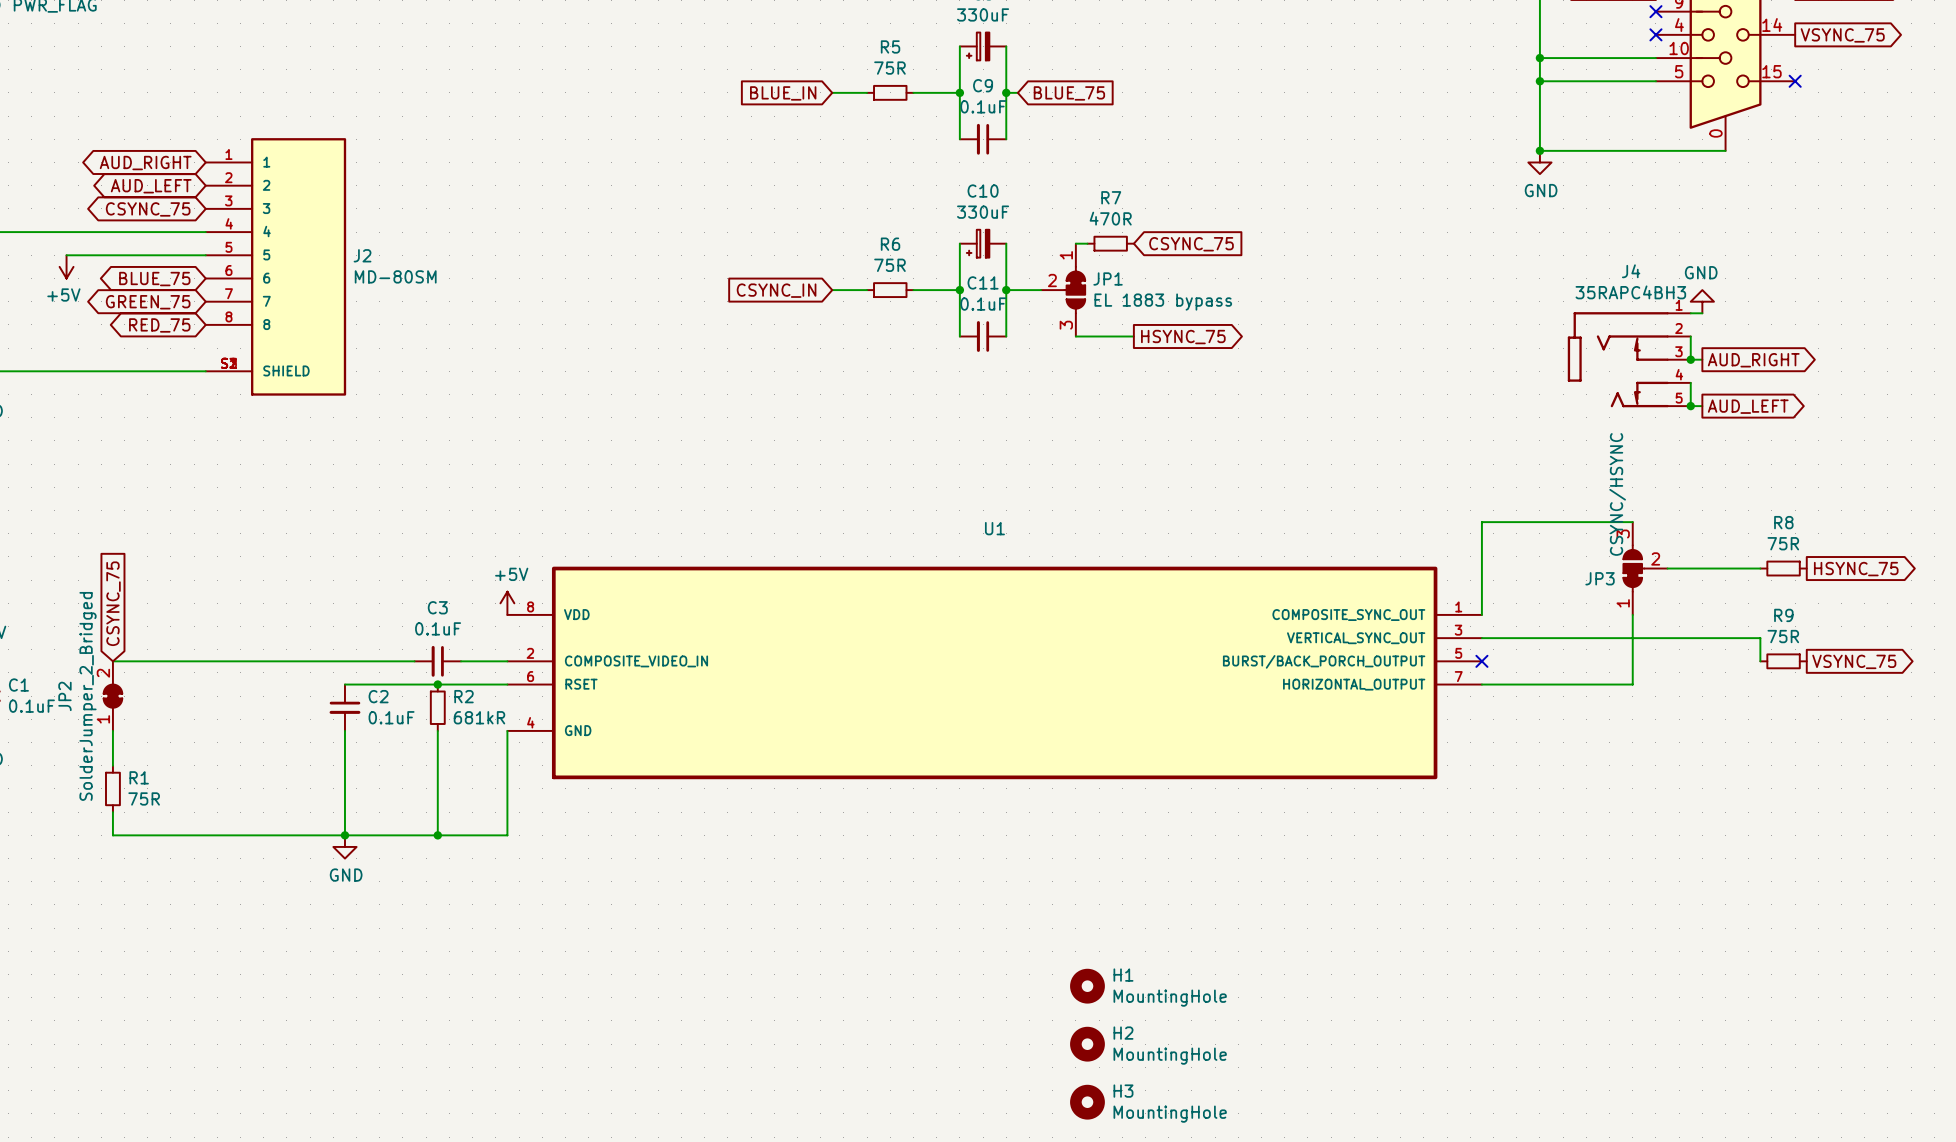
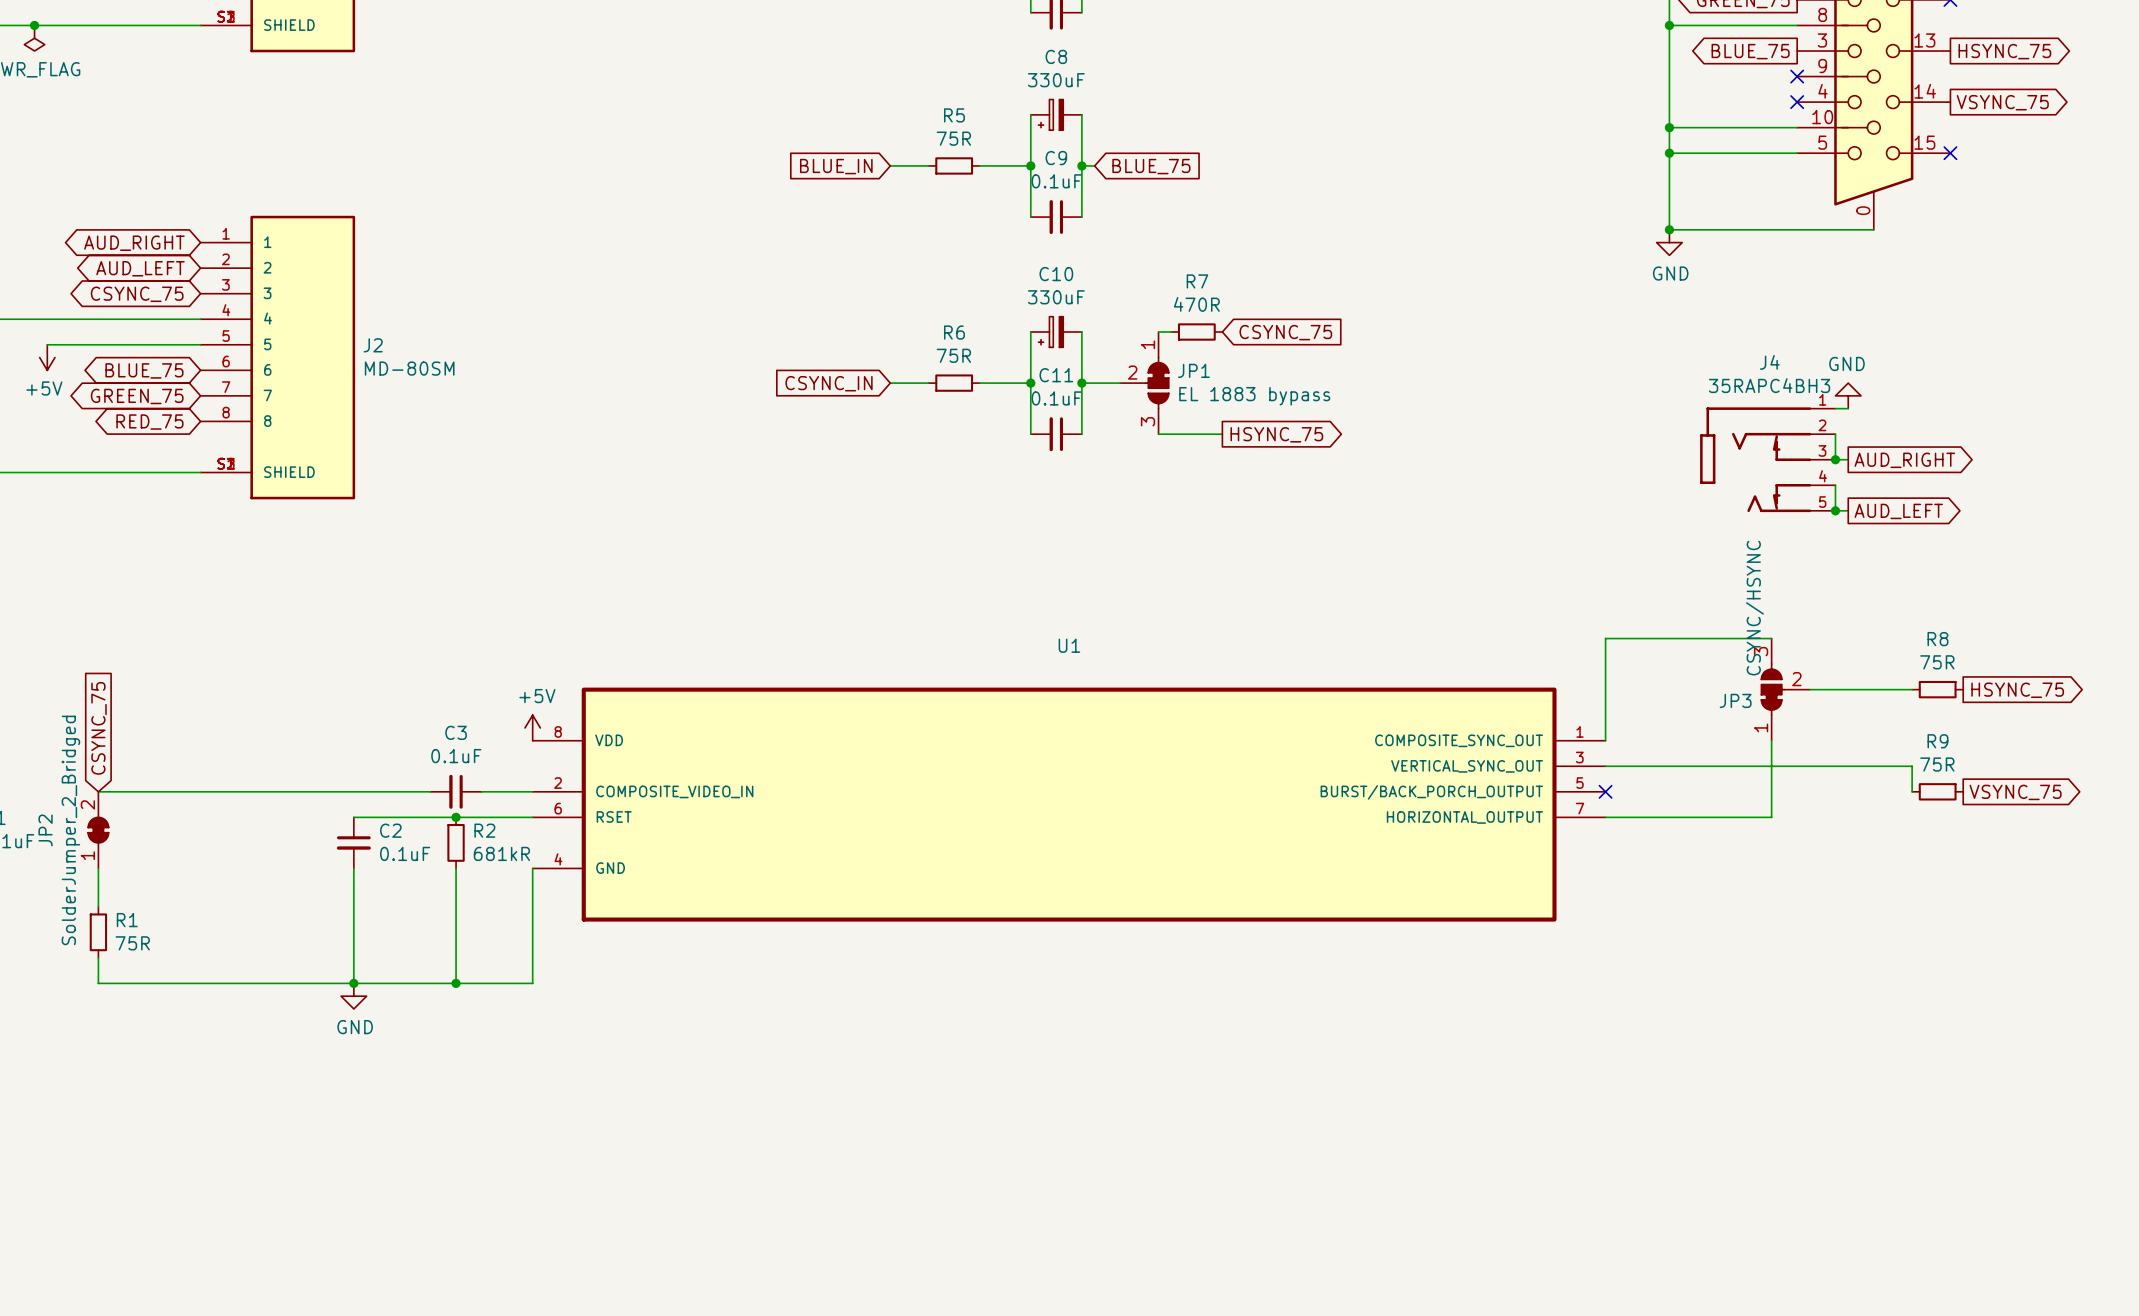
H1: MountingHole (1087, 986) -> none
H2: MountingHole (1087, 1044) -> none
H3: MountingHole (1087, 1102) -> none

